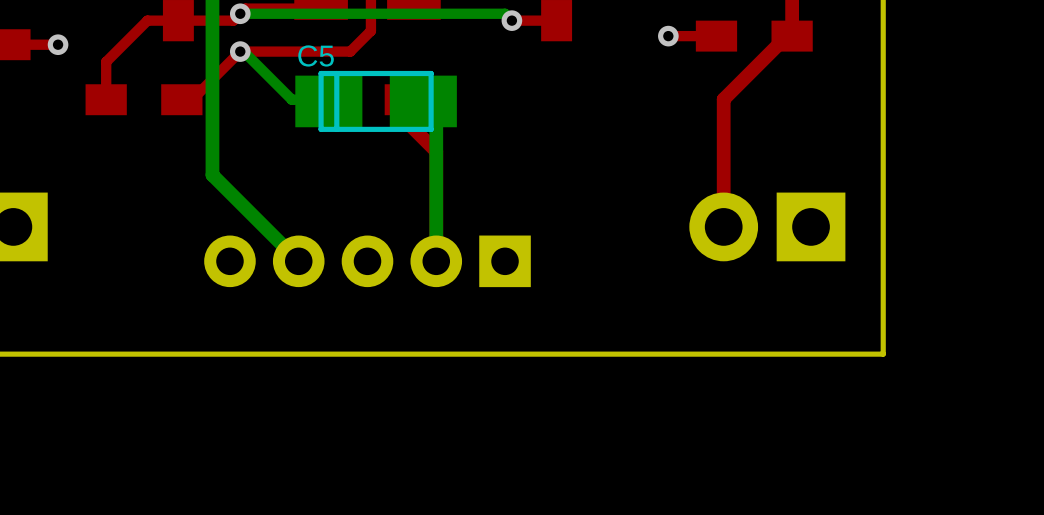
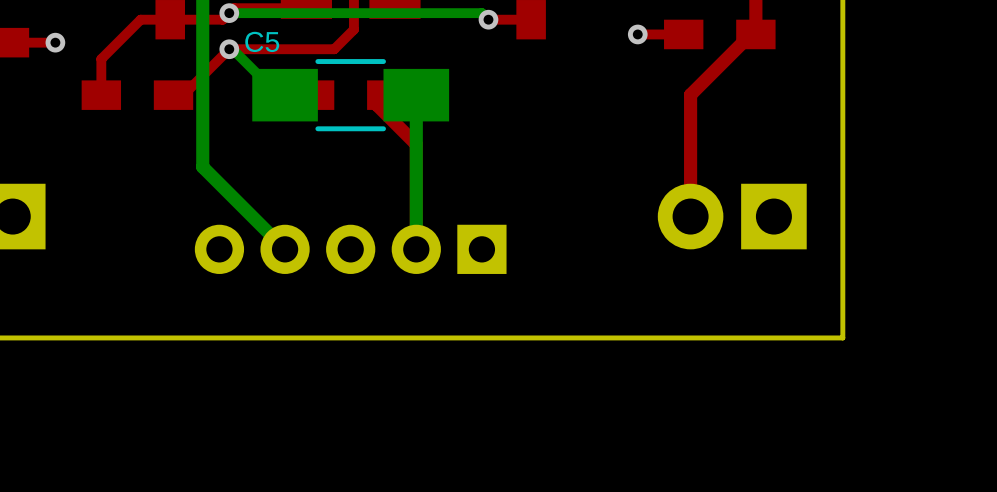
C5 footprint: [295, 70, 457, 132] -> [252, 59, 450, 132]

